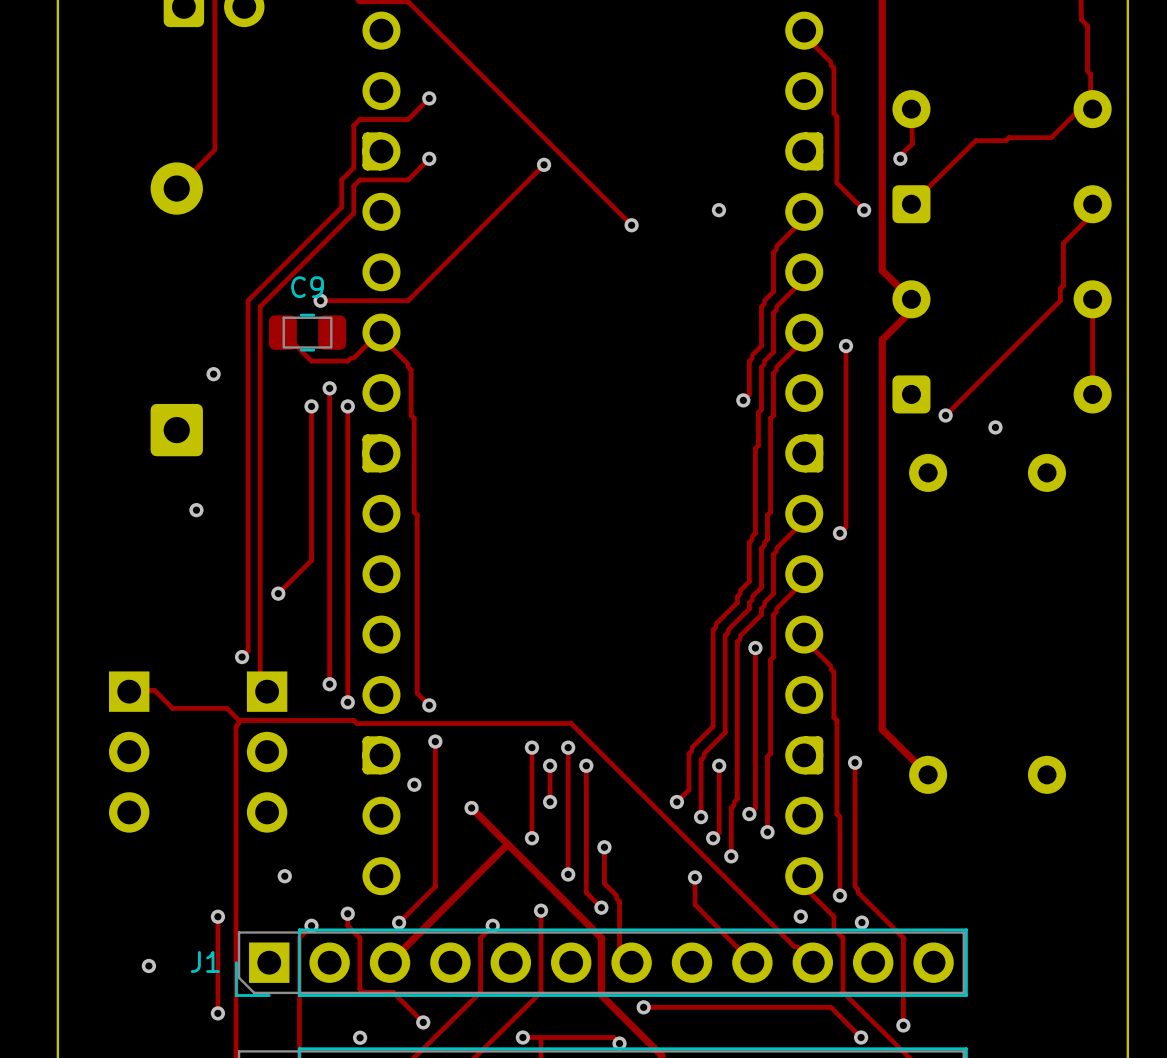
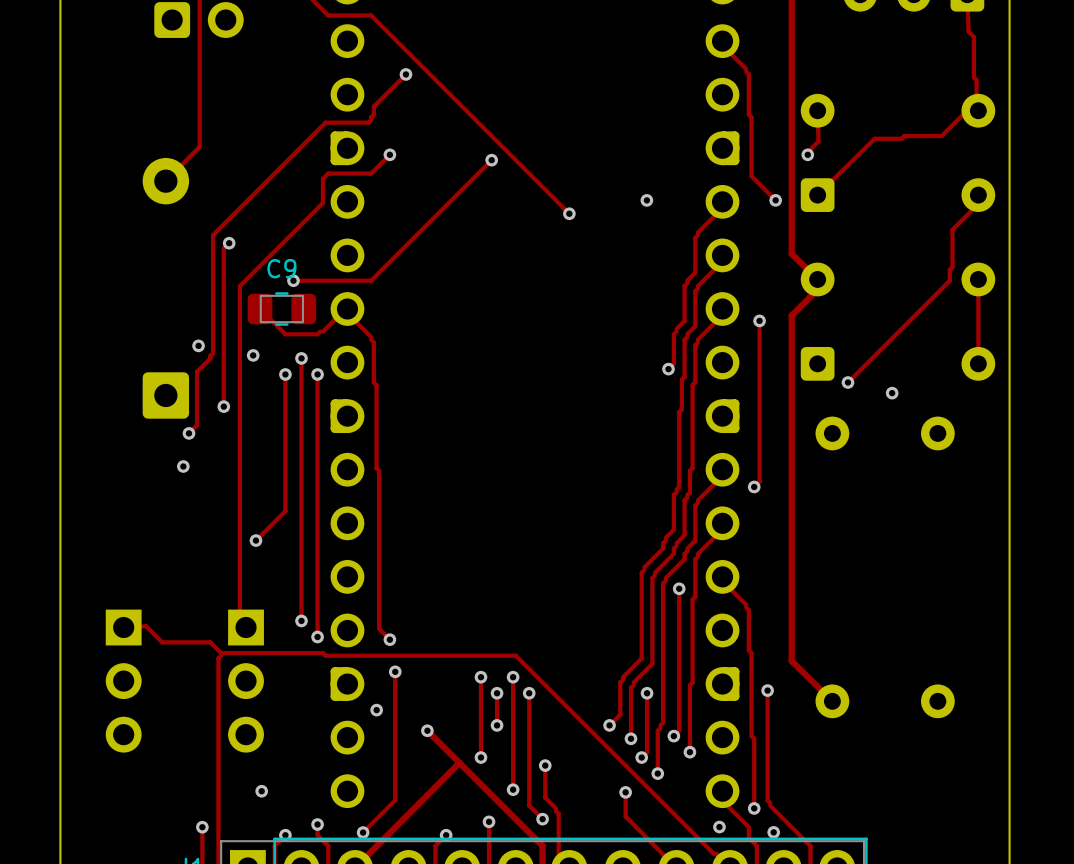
track: (429, 98) (408, 119) (359, 119) (356, 122) -> (405, 74) (373, 106) (373, 114) (368, 122) (325, 122)
via position: (429, 98) -> (405, 74)
track: (353, 125) (353, 167) (341, 179) (341, 207) (248, 300) (248, 651) (242, 657) -> (322, 125) (213, 235) (213, 353) (197, 371) (197, 425) (188, 433)
track: none -> (229, 243) (223, 248) (223, 406)
via: none -> (229, 243)
via: none -> (253, 355)
via: none -> (223, 406)
via: none -> (188, 433)
via: (242, 657) -> none

